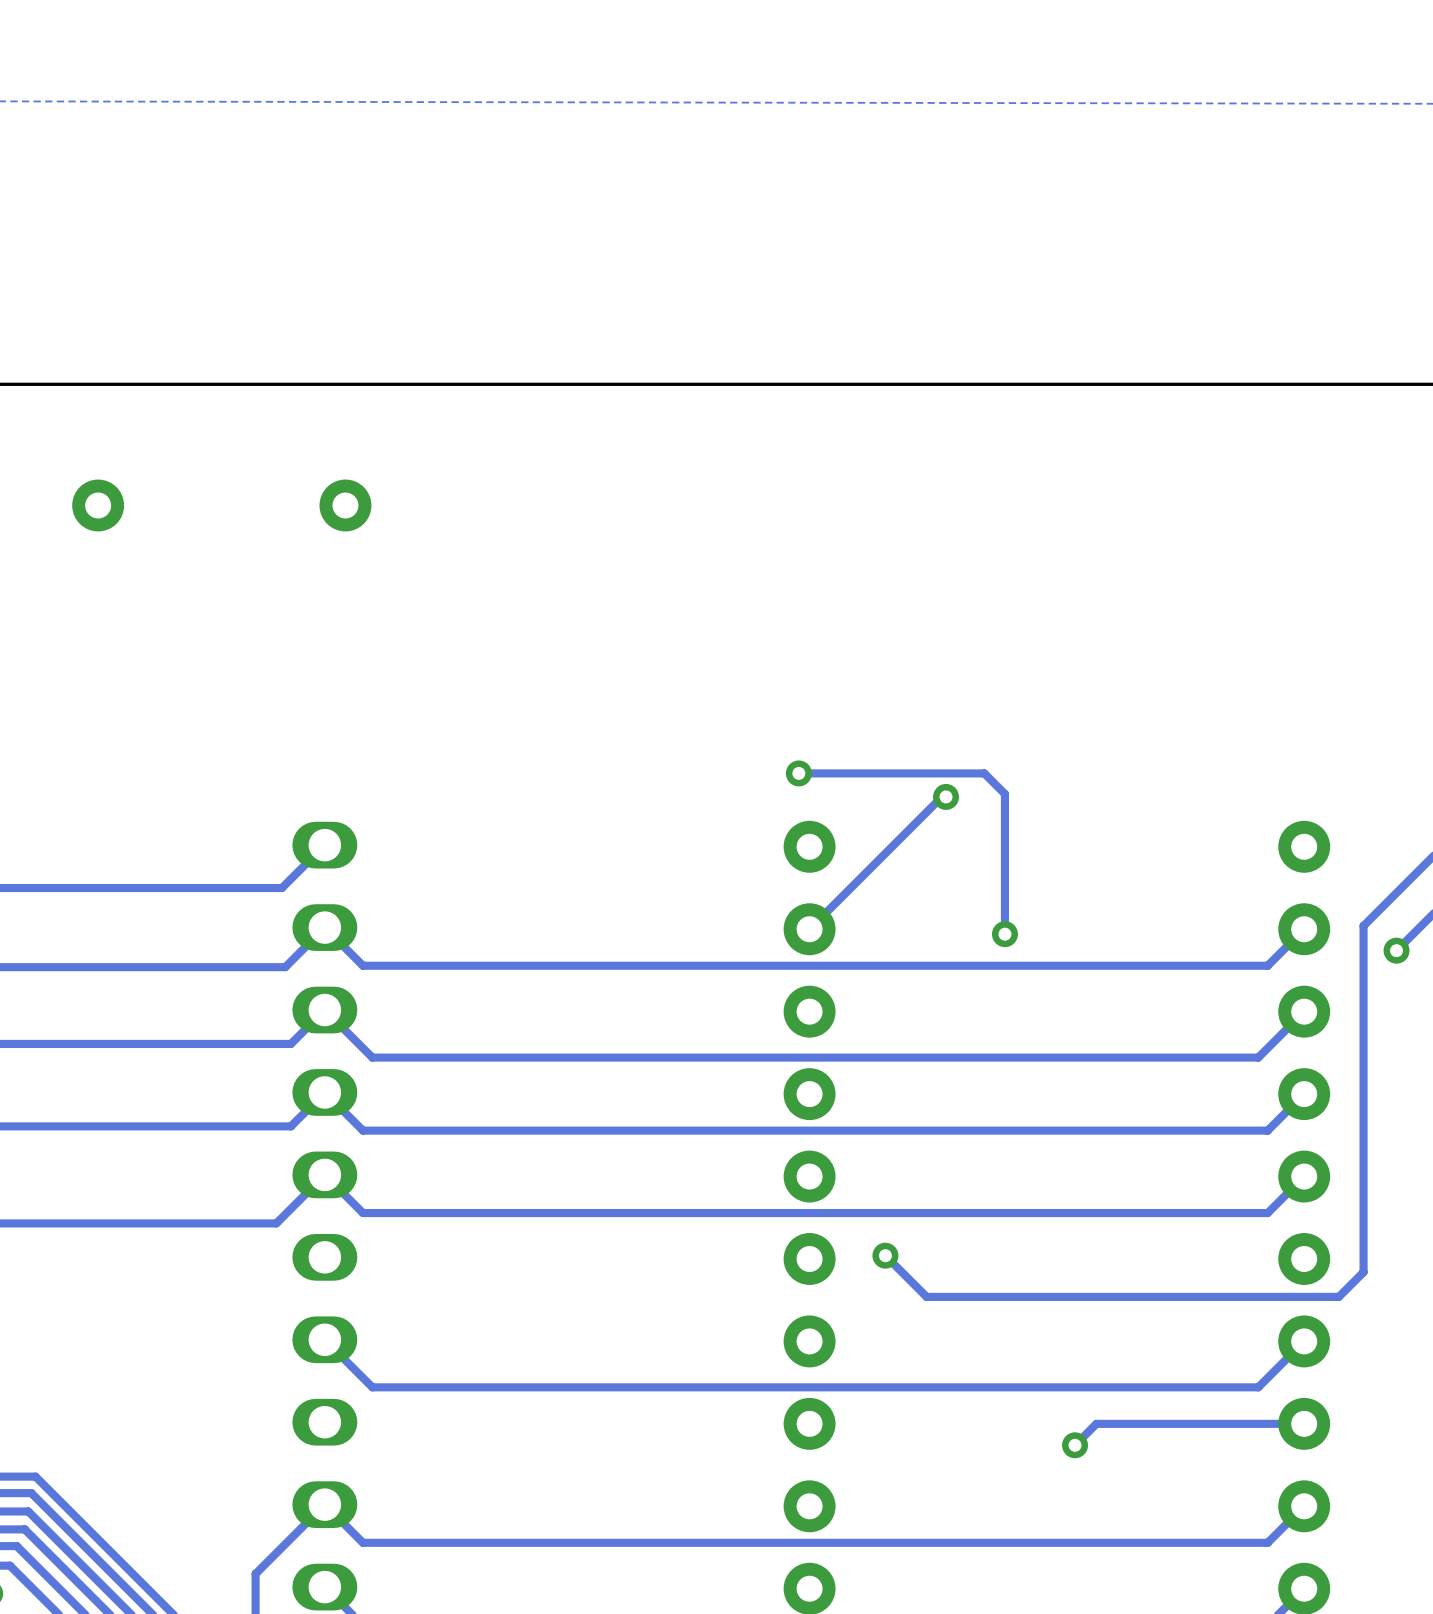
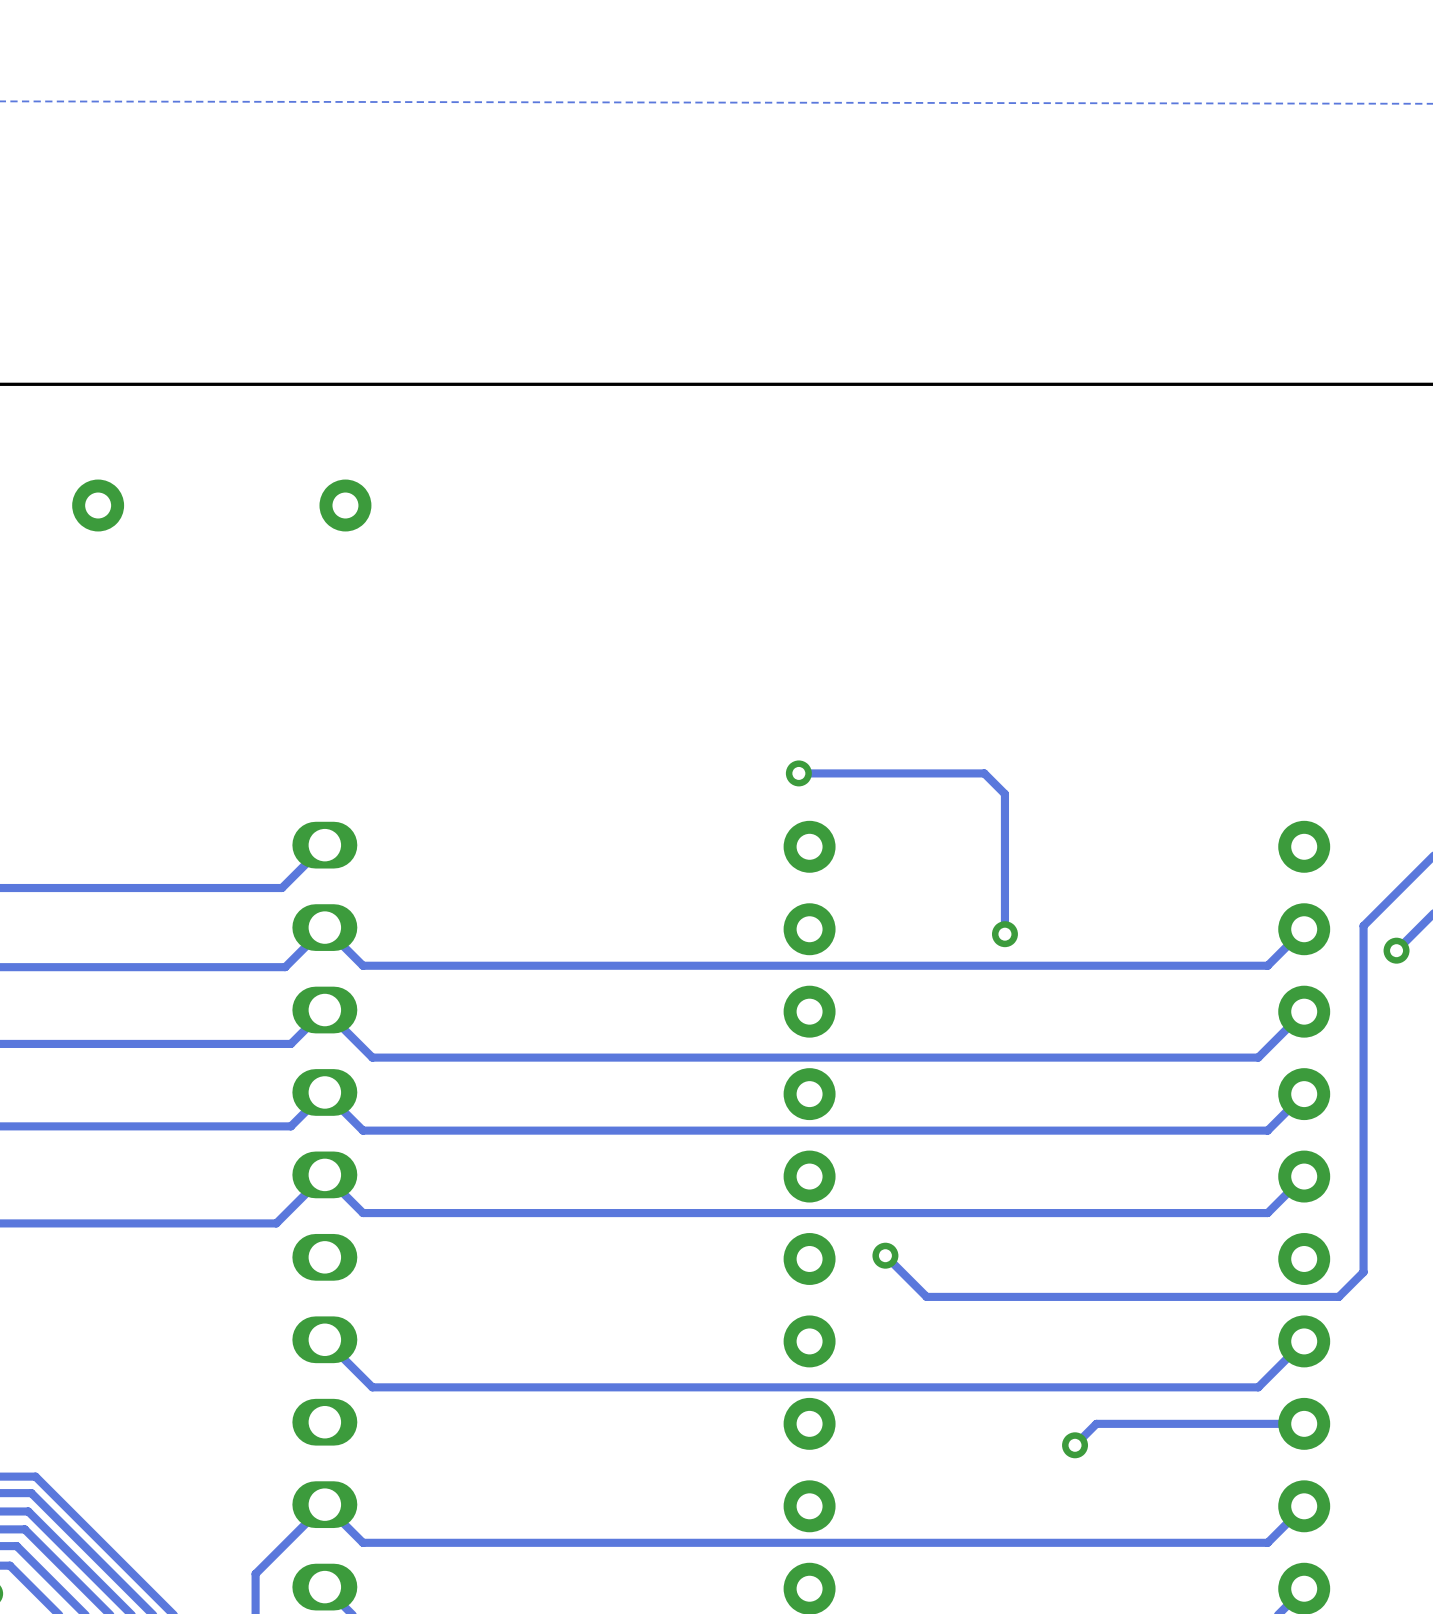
track: (946, 796) (941, 796) (809, 929) -> none
via: (946, 796) -> none

